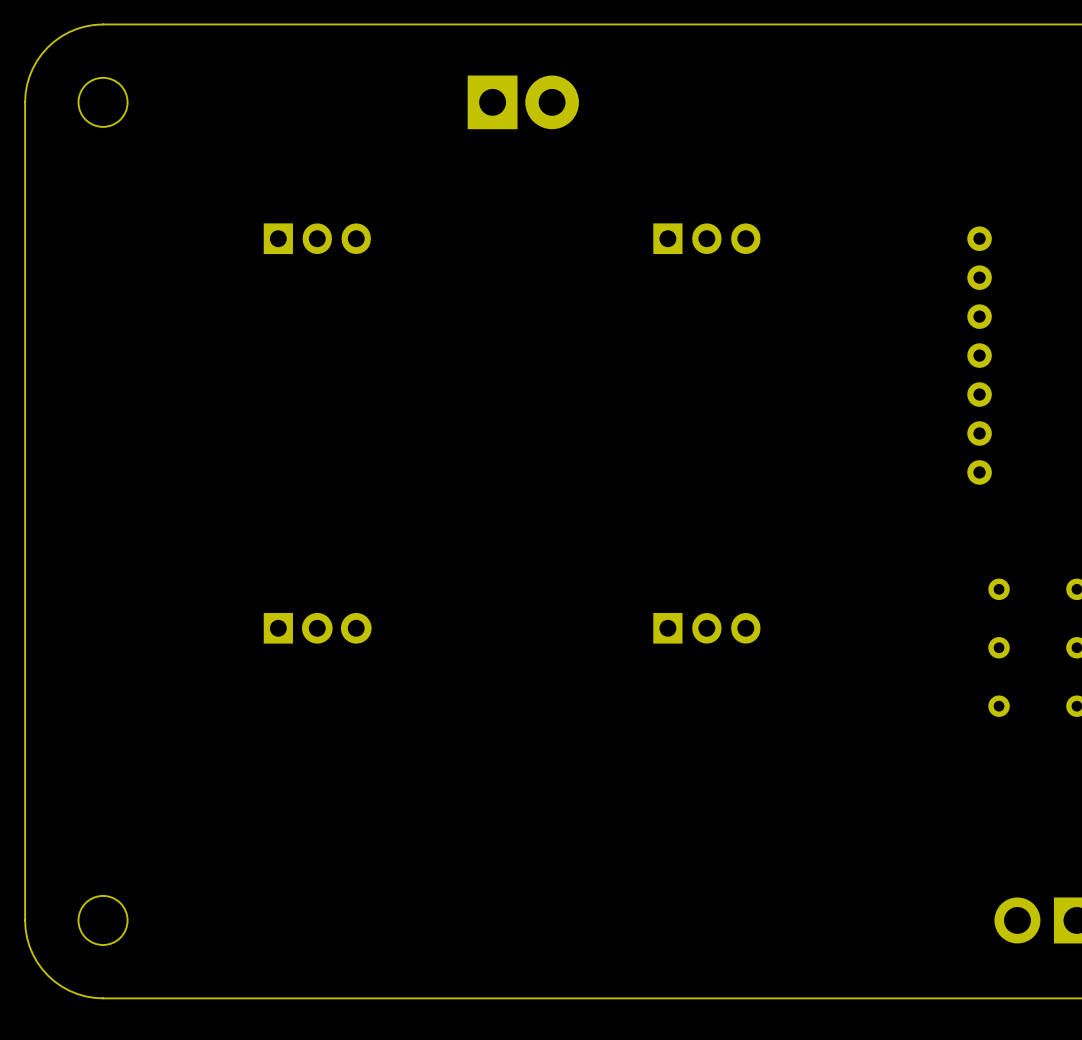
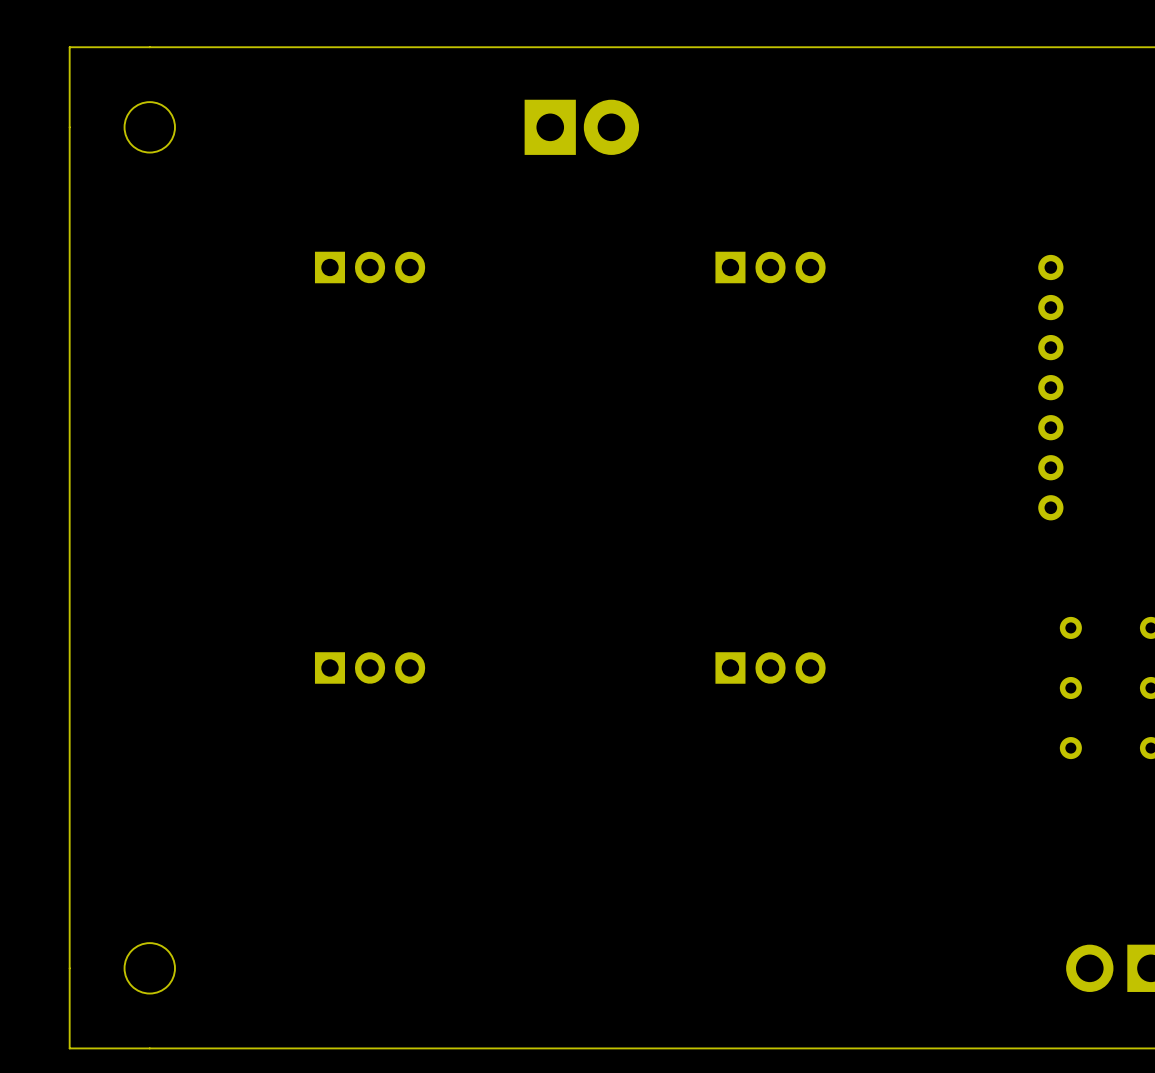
board edge: (103, 24) (77, 28) (61, 36) (47, 47) (32, 68) (27, 85) (25, 102) -> (149, 47) (69, 47) (69, 127)
part footprint: [263, 612, 372, 644] -> [314, 652, 426, 684]
board edge: (25, 920) (27, 937) (32, 954) (47, 975) (61, 986) (77, 994) (103, 998) -> (69, 968) (69, 1048) (149, 1048)

